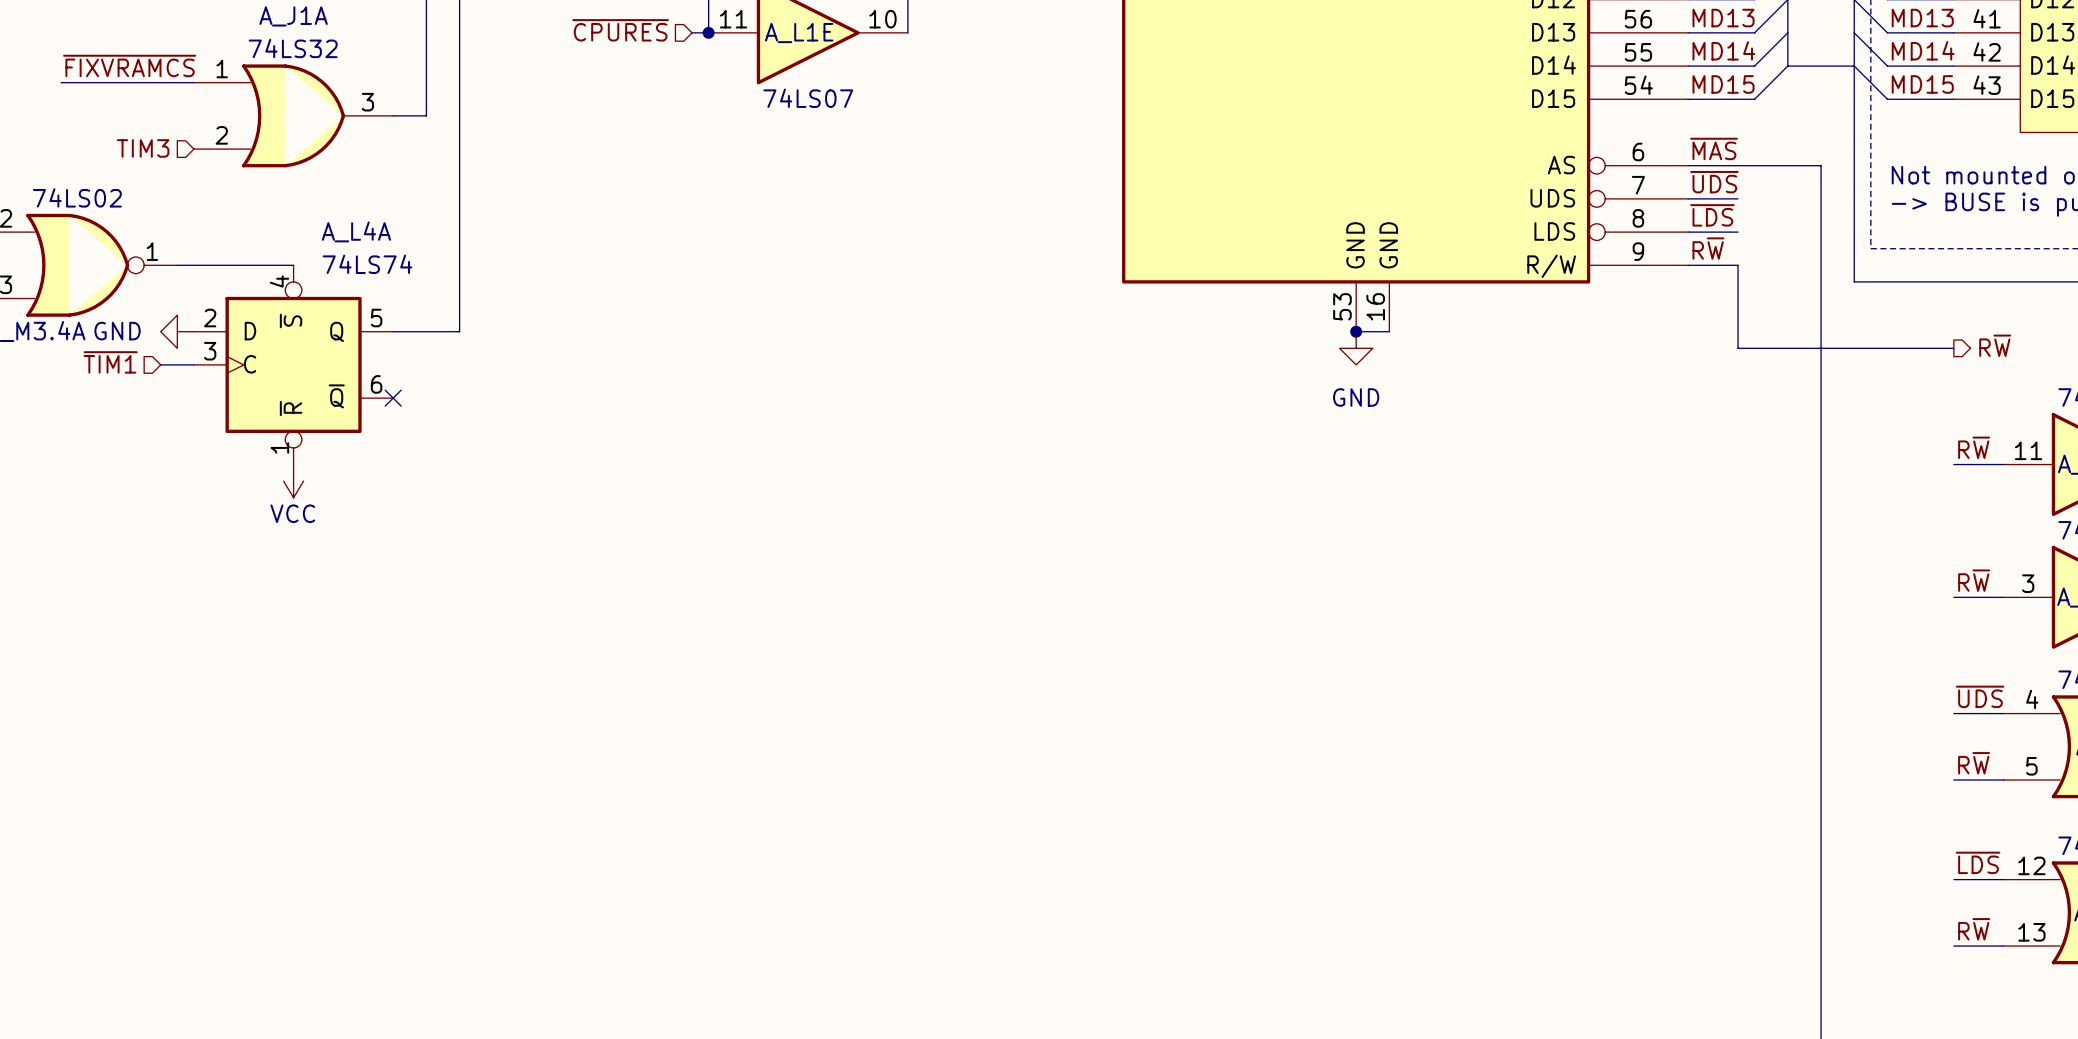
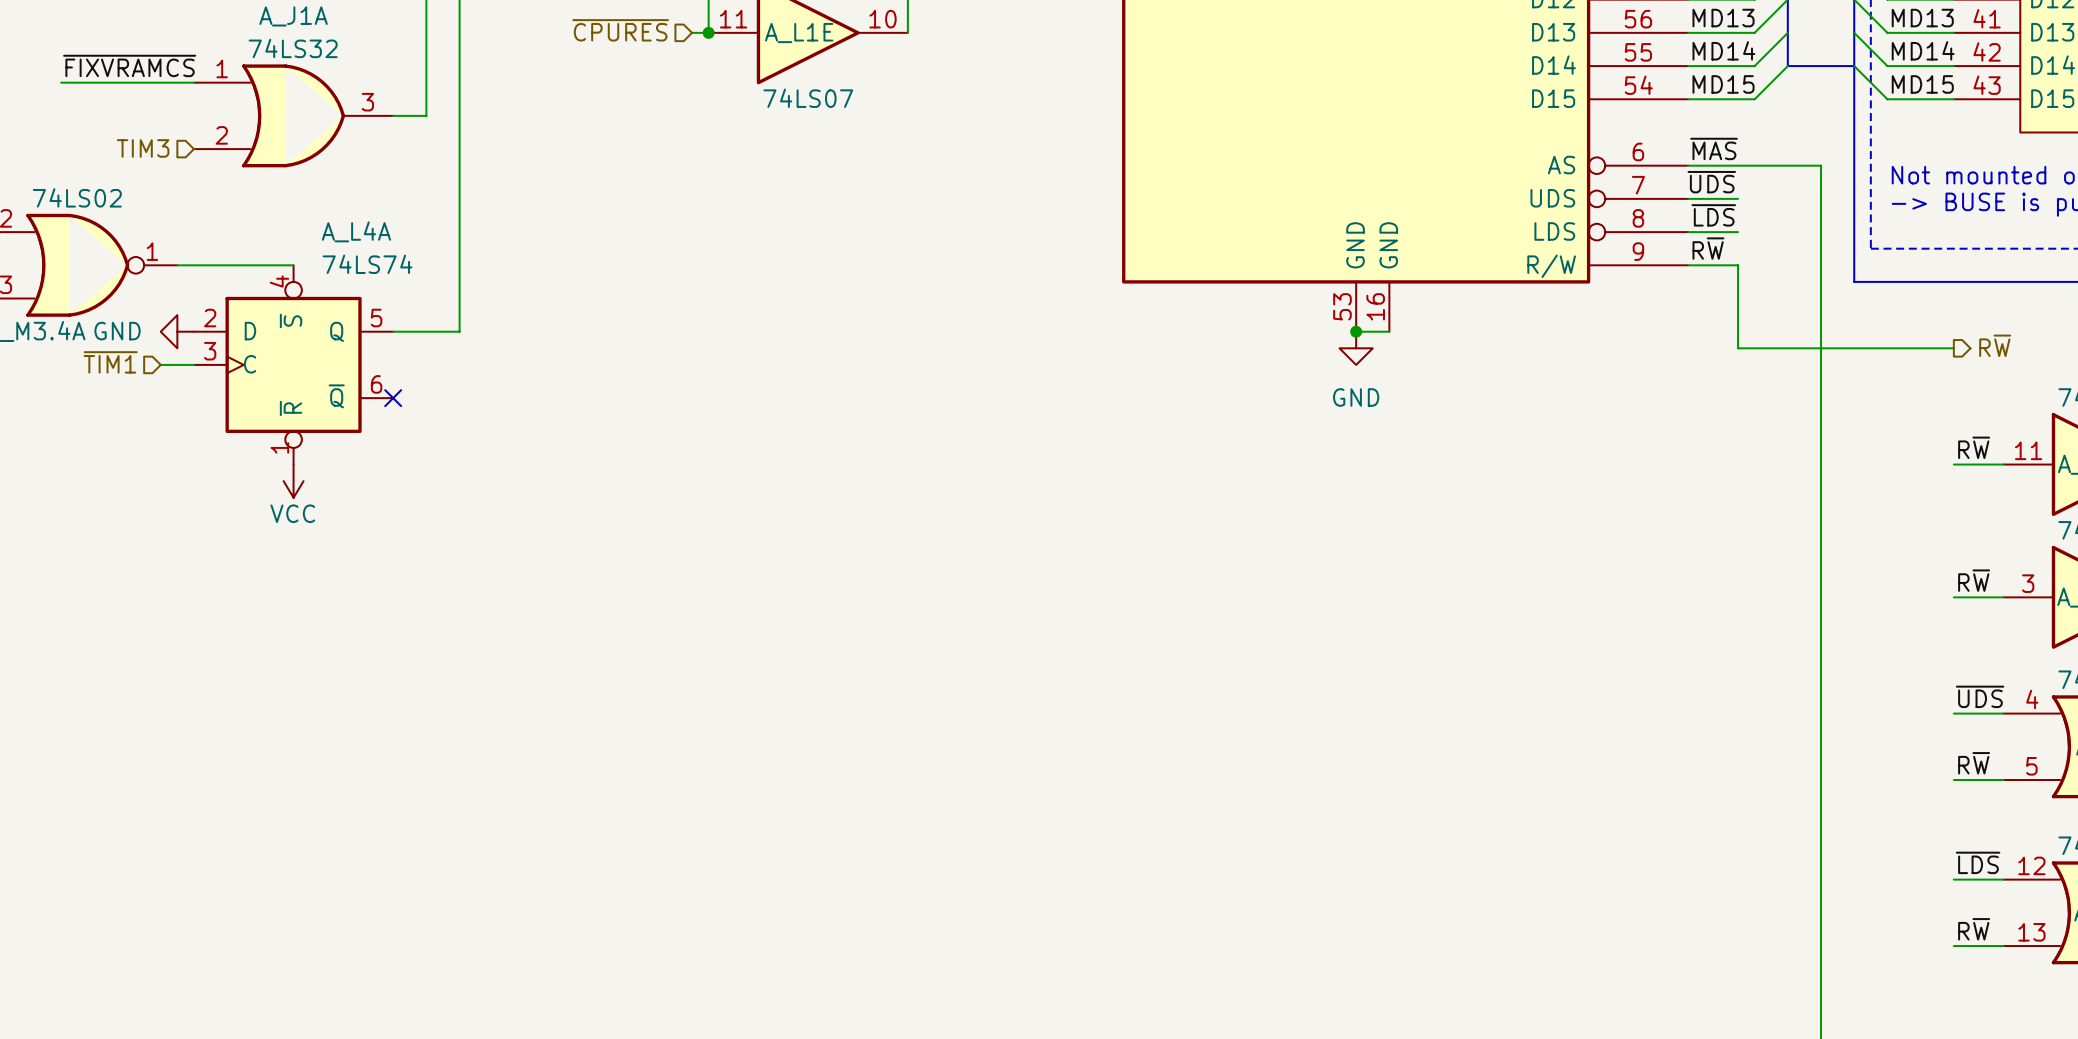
label position: ~{UDS} (1714, 182) -> ~{UDS} (1711, 182)
label position: ~{LDS} (1712, 215) -> ~{LDS} (1713, 215)

